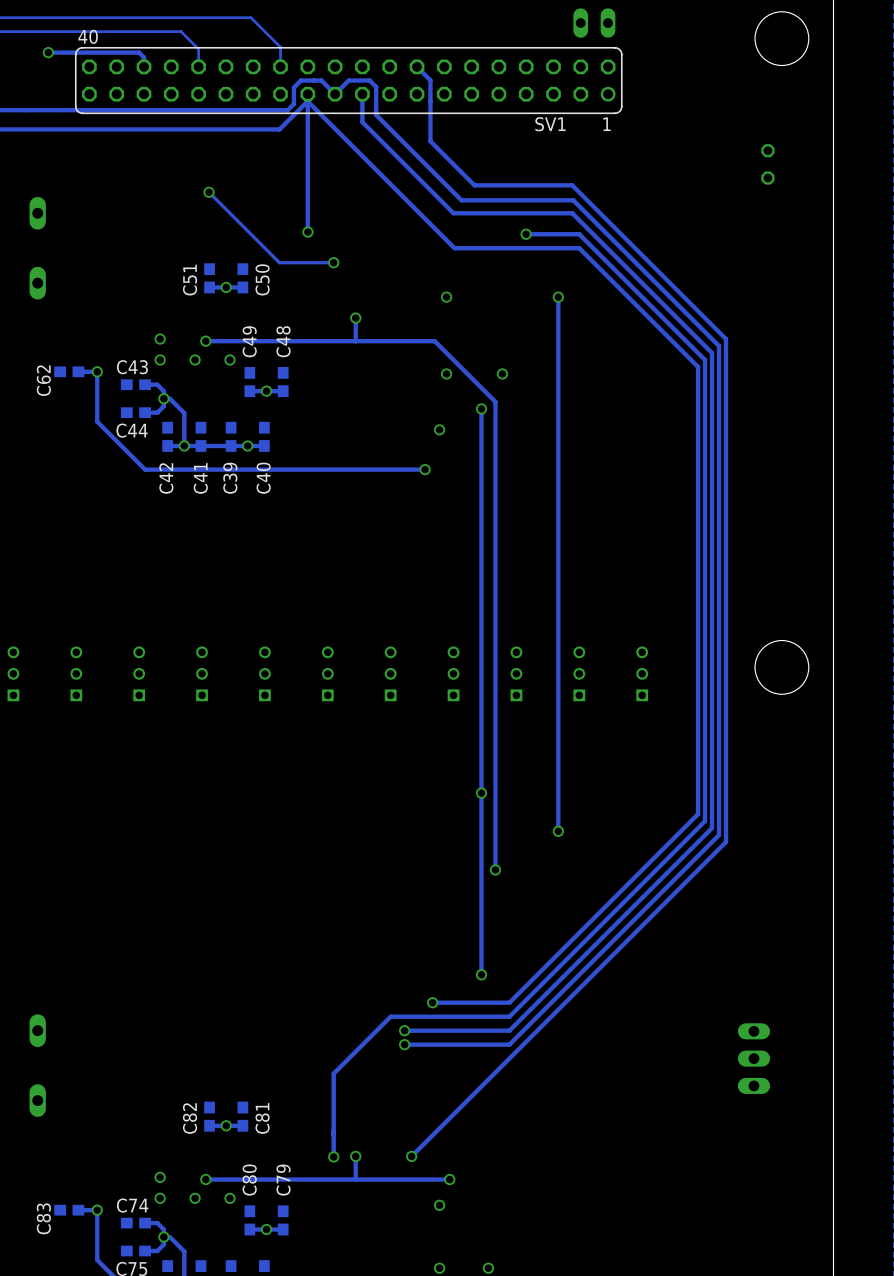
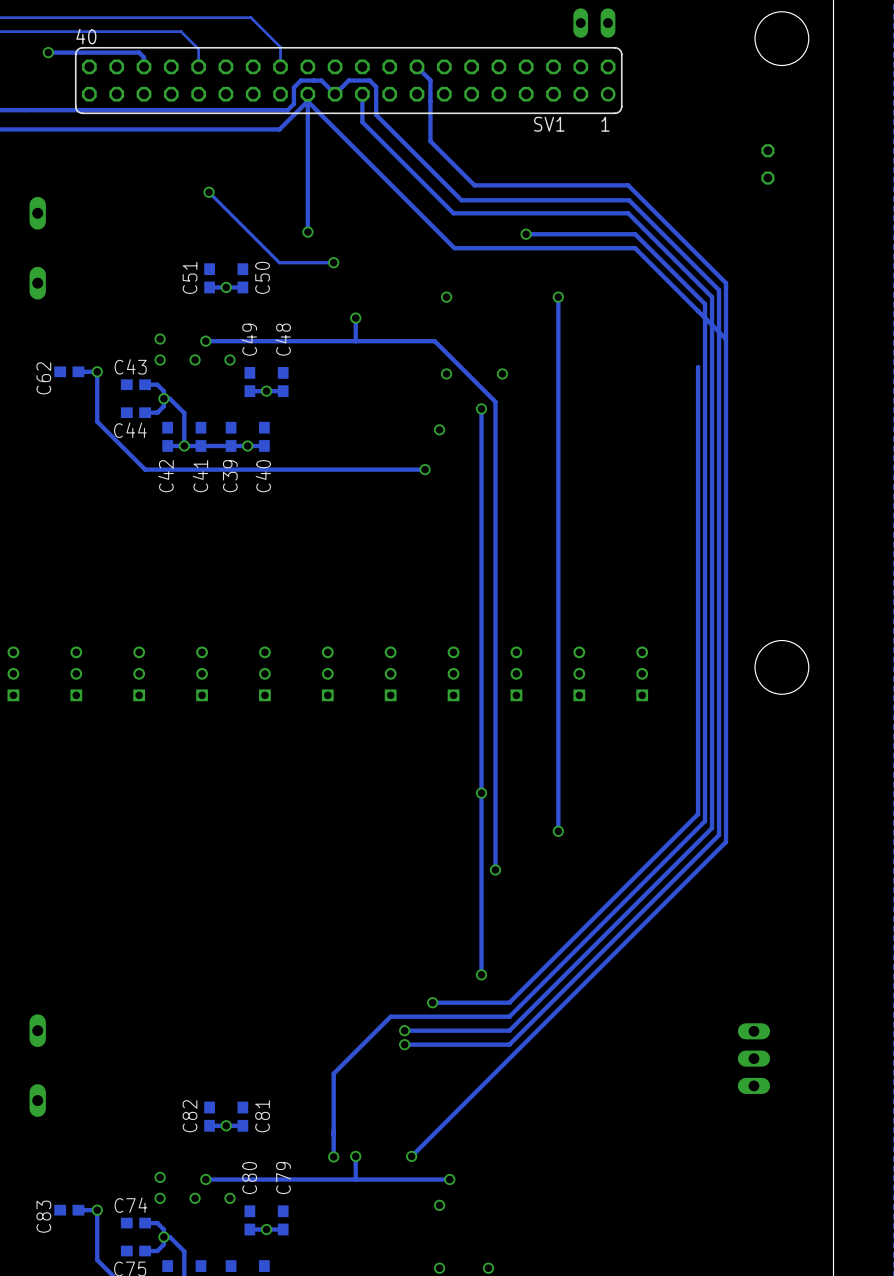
track: (572, 185) (635, 248) -> (579, 248) (635, 248)
track: none -> (572, 185) (628, 185) (726, 283) (726, 339)
track: (573, 200) (719, 346) -> (573, 200) (629, 200) (719, 290) (719, 346)
track: (572, 213) (712, 353) -> (572, 213) (628, 213) (712, 297) (712, 353)
track: (579, 234) (705, 359) -> (579, 234) (635, 234) (705, 304) (705, 359)
track: (579, 248) (698, 366) -> none

